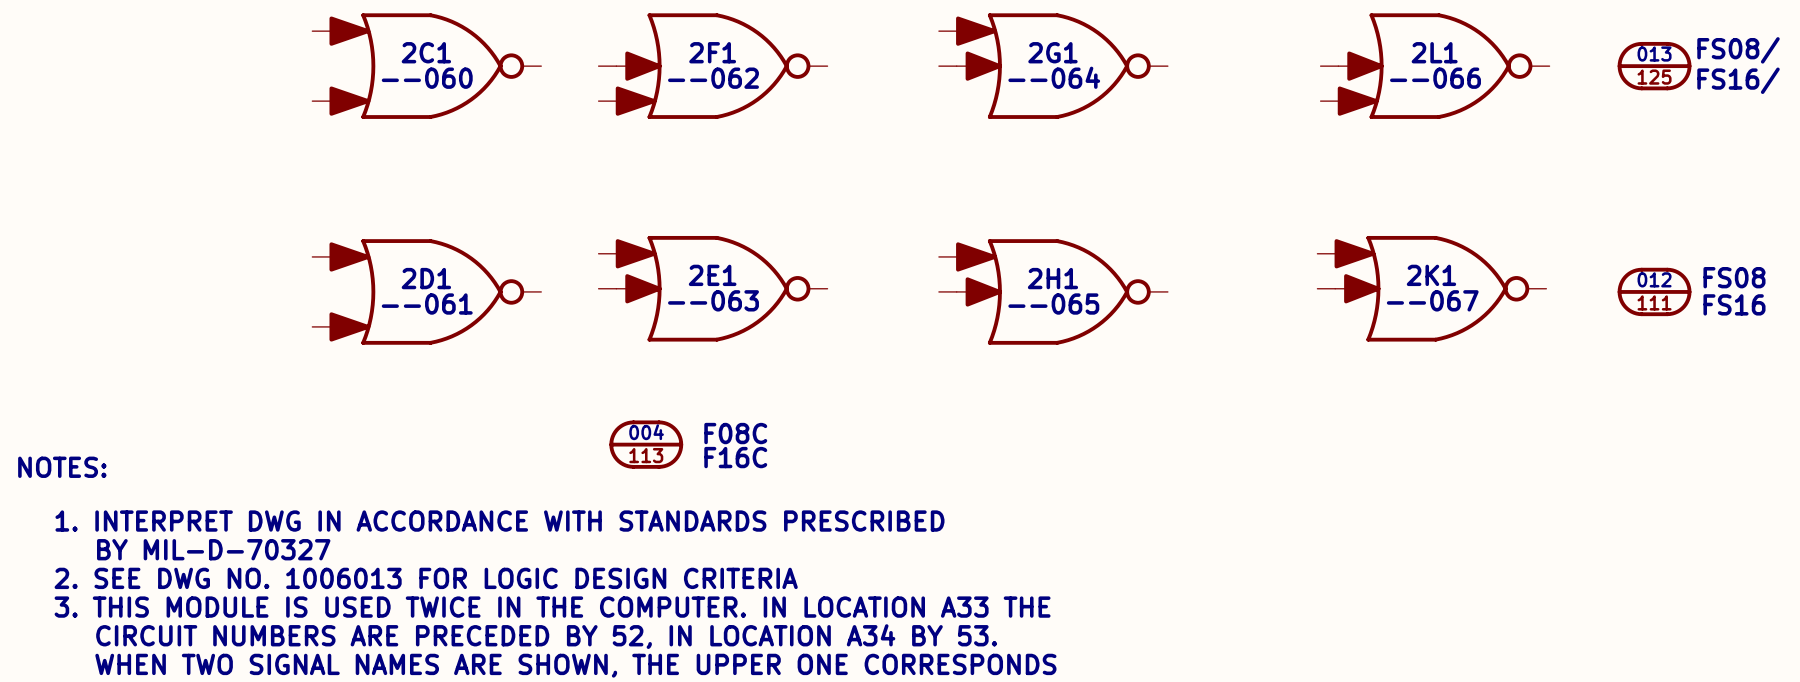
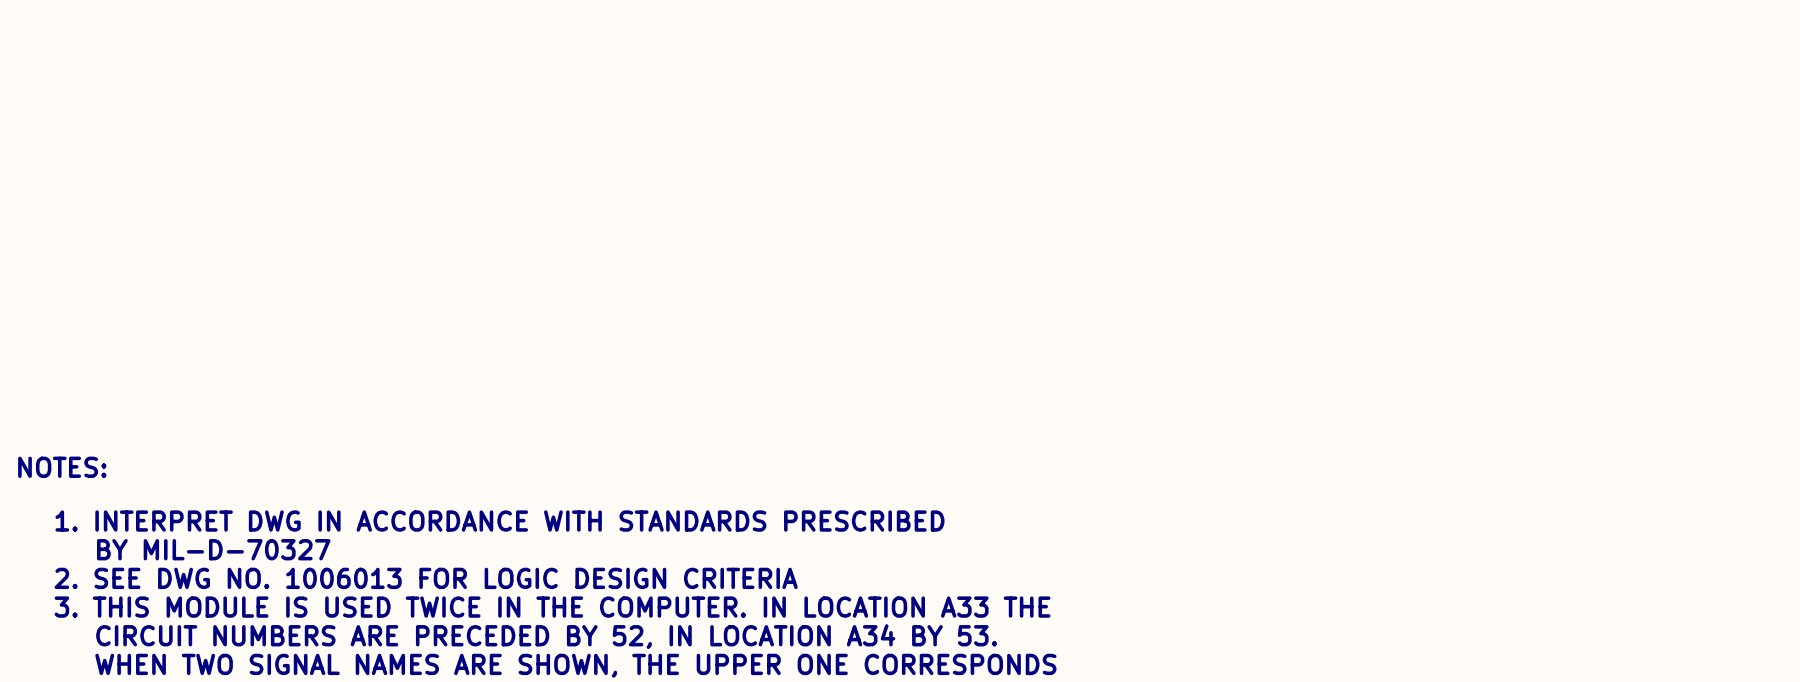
part: (426, 66) -> none
part: (713, 66) -> none
part: (1053, 66) -> none
part: (1435, 66) -> none
part: (1654, 66) -> none
part: (713, 288) -> none
part: (1431, 288) -> none
part: (426, 291) -> none
part: (1053, 291) -> none
part: (1654, 291) -> none
part: (646, 444) -> none

